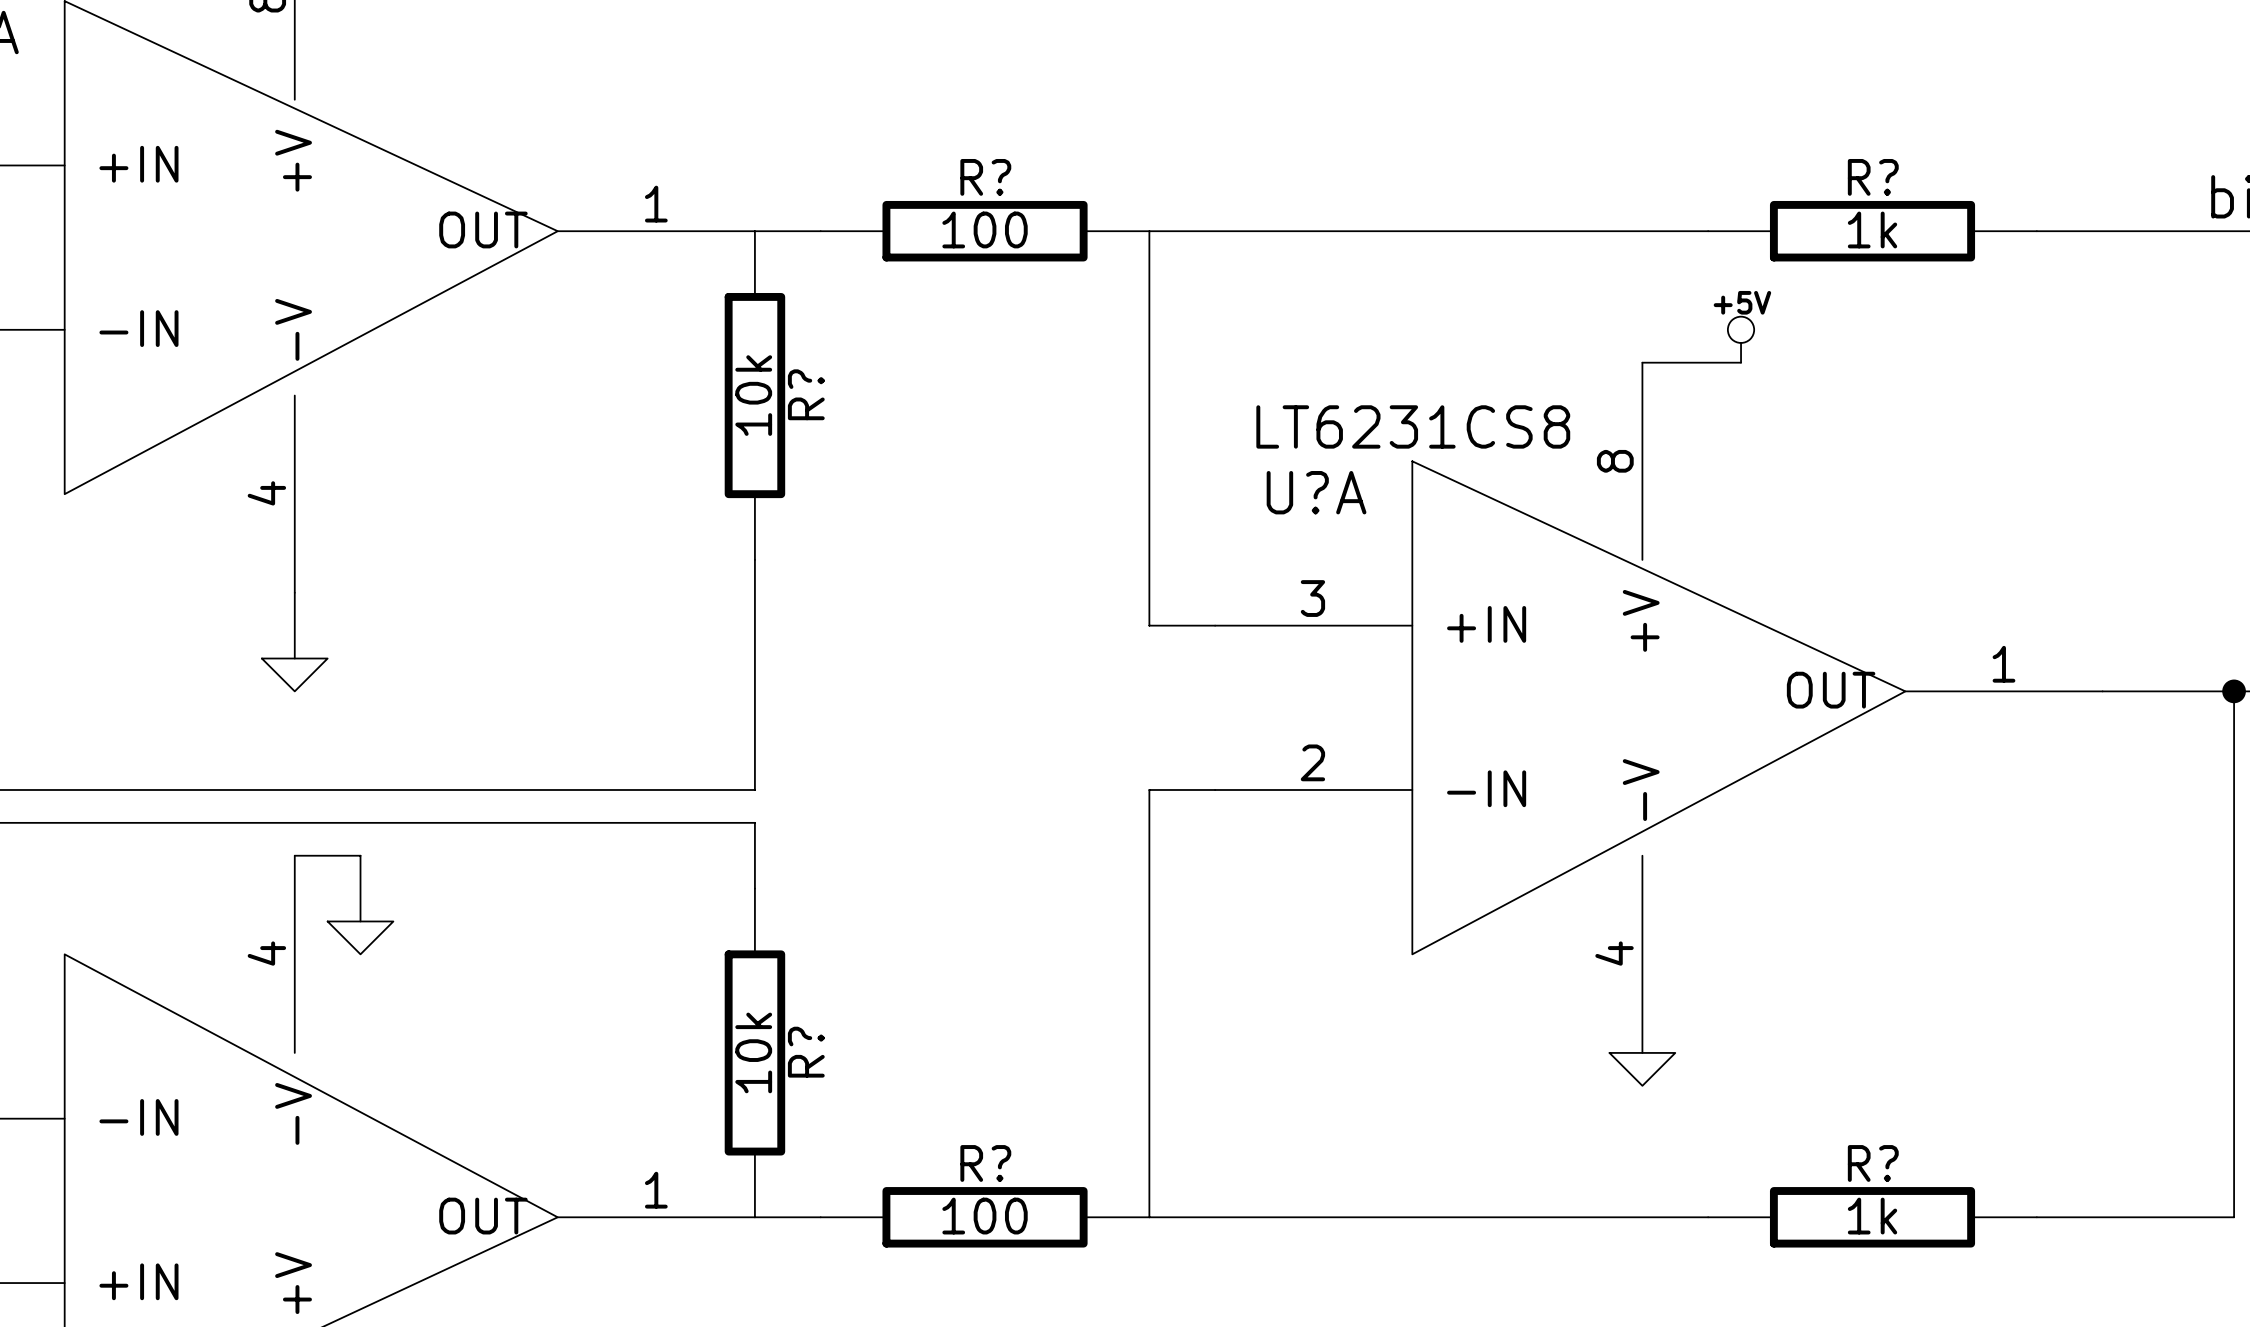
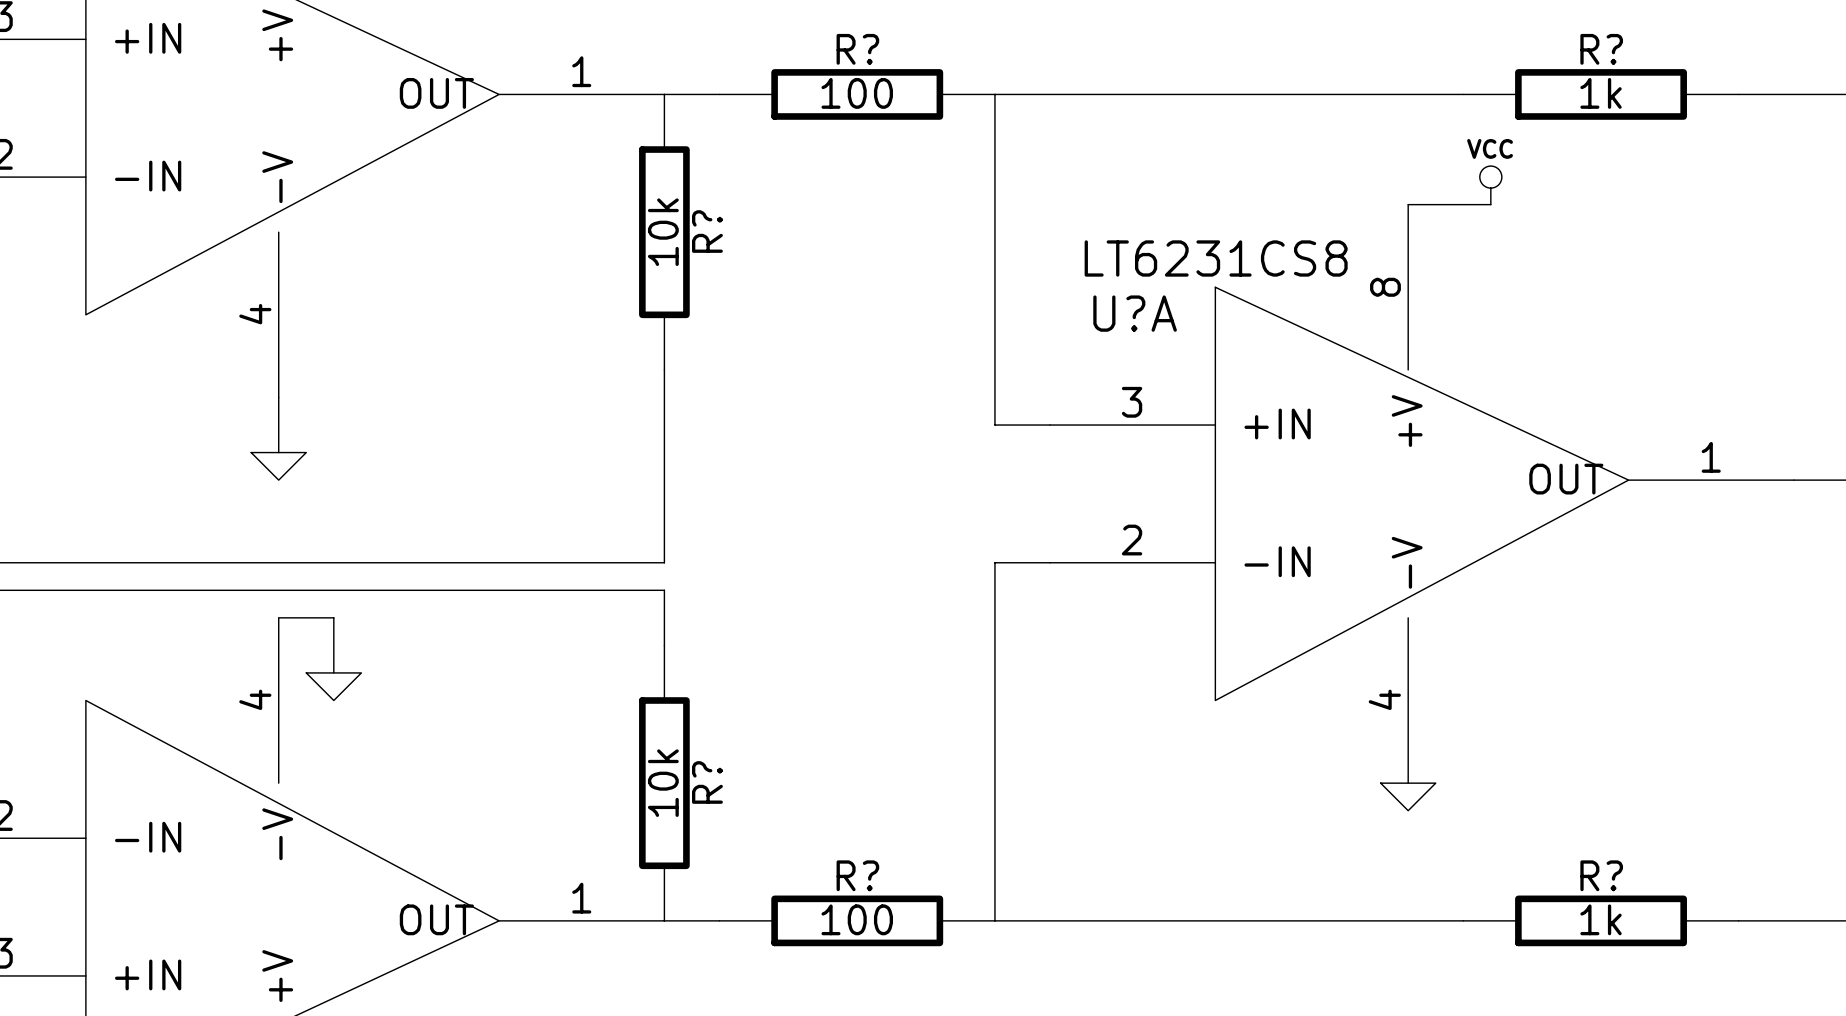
power symbol: +5V (1741, 339) -> VCC (1490, 185)

